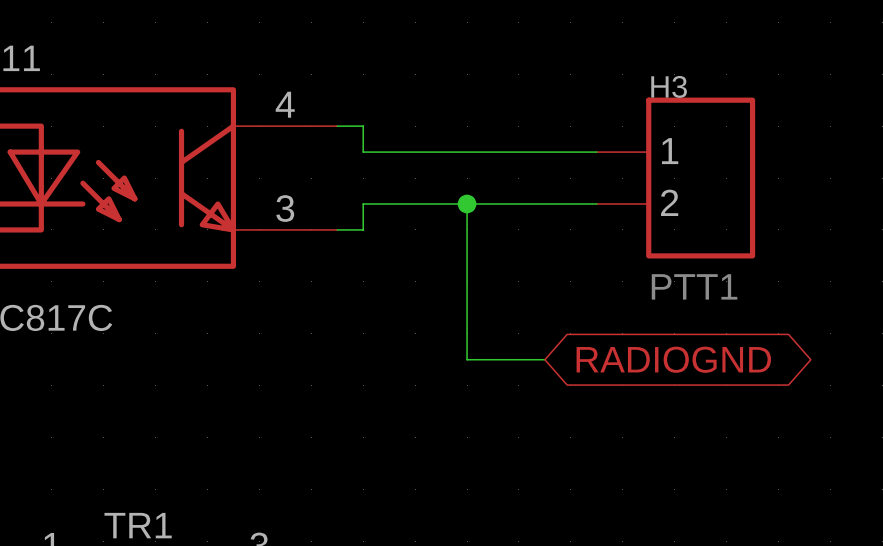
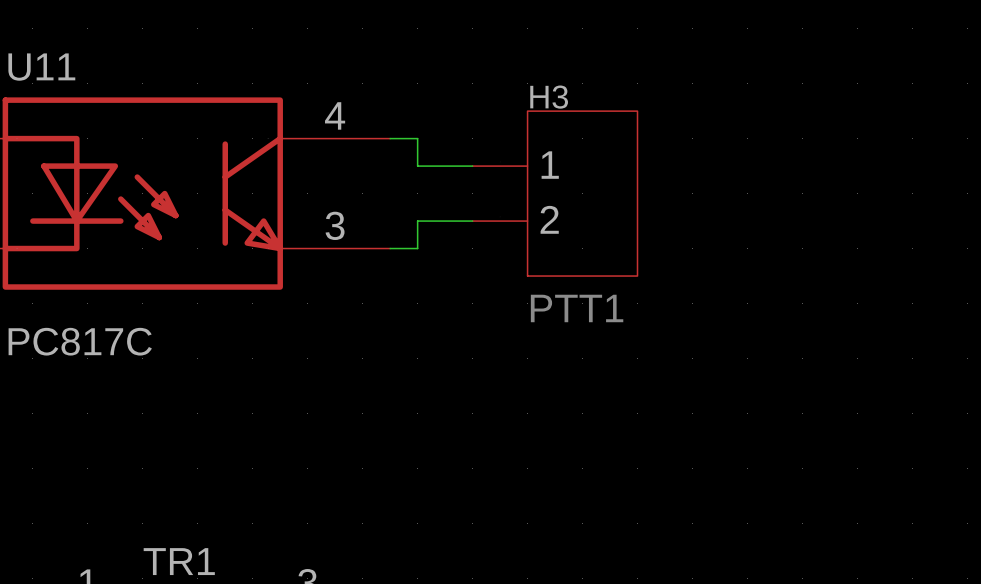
H3 symbol: [596, 97, 756, 259] -> [472, 111, 638, 277]
wire: (415, 152) (596, 152) -> none
wire: (415, 203) (596, 203) -> none
wire: (467, 203) (467, 359) (544, 359) -> none
junction: (467, 203) -> none
text position: PTT1 (694, 286) -> PTT1 (577, 308)
global label: RADIOGND (673, 359) -> none

